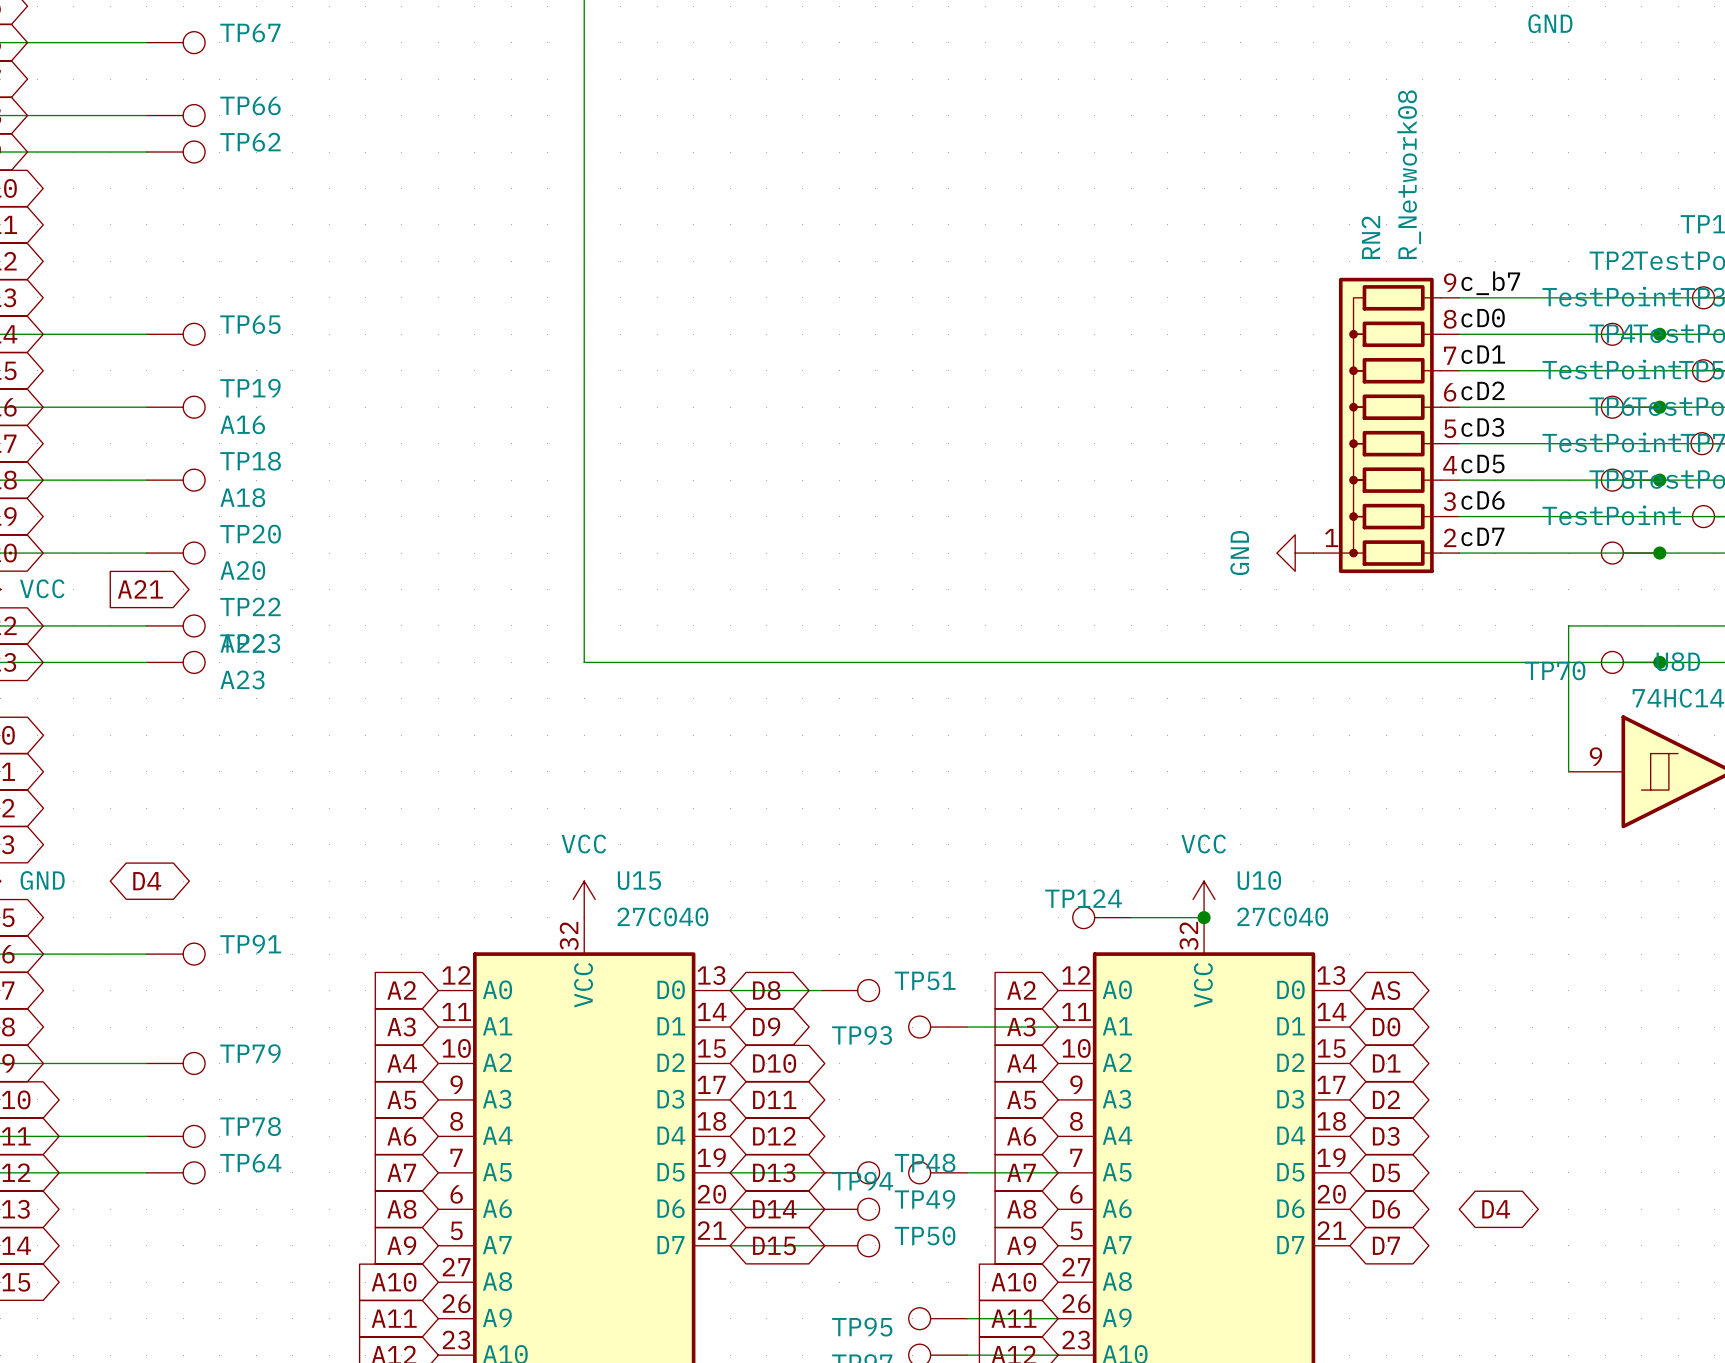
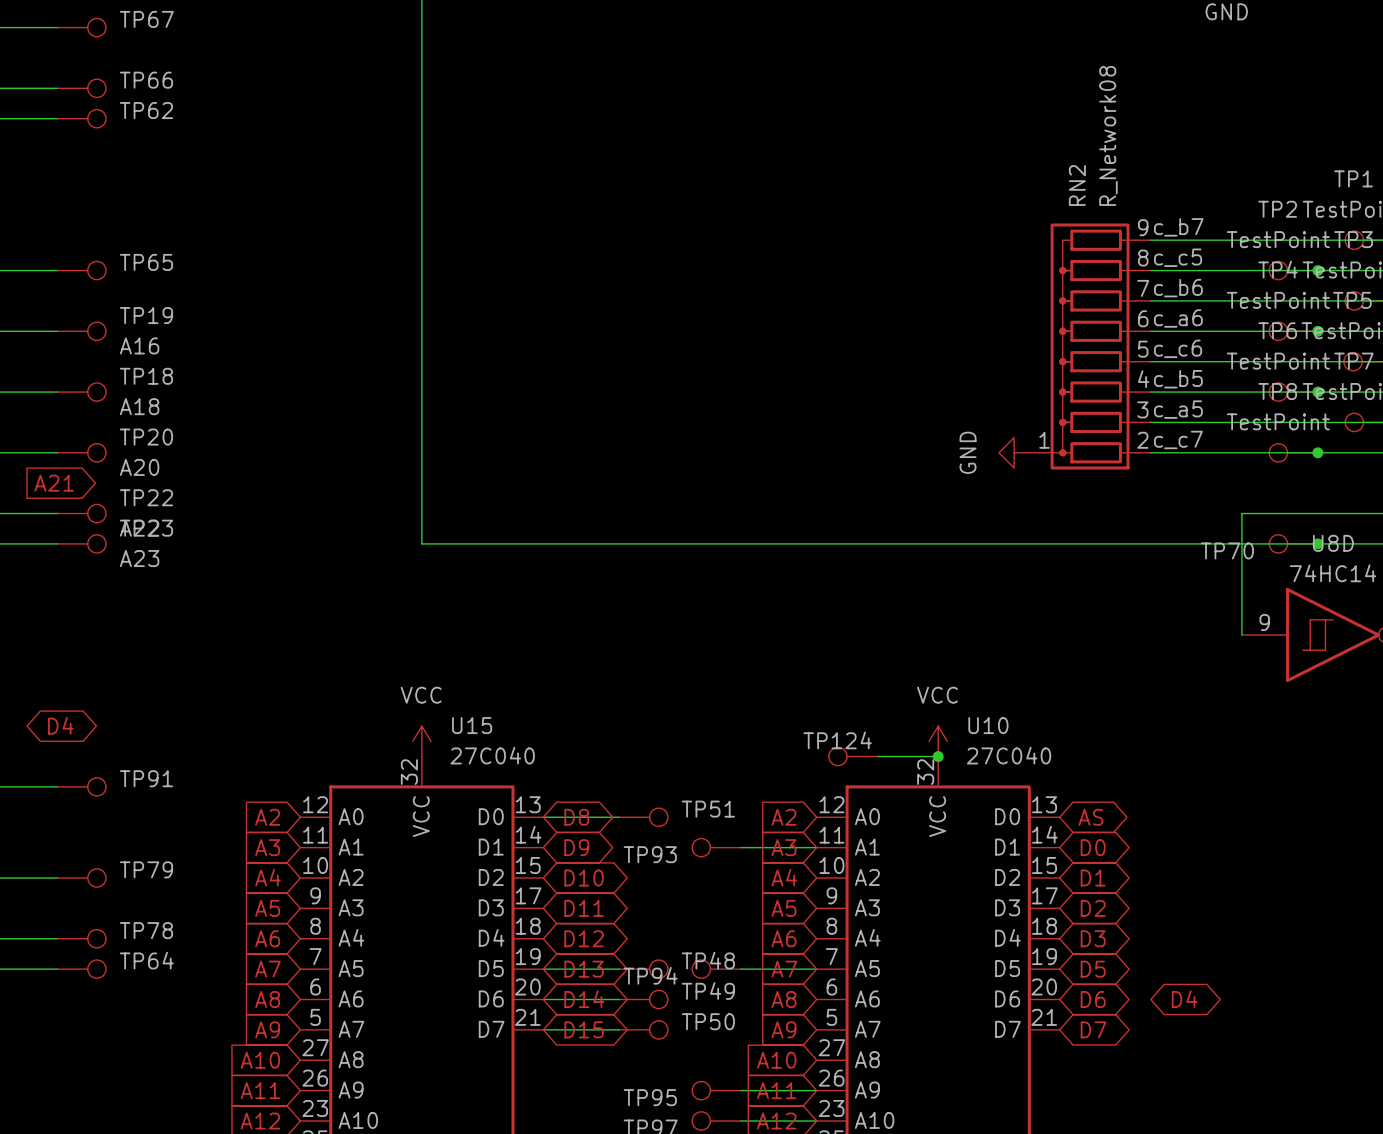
label: cD0 (1483, 318) -> c_c5 (1178, 257)
label: cD1 (1483, 354) -> c_b6 (1178, 288)
label: cD2 (1483, 390) -> c_a6 (1178, 318)
label: cD3 (1482, 427) -> c_c6 (1178, 348)
label: cD5 (1482, 464) -> c_b5 (1178, 379)
label: cD6 (1483, 500) -> c_a5 (1178, 409)
label: cD7 (1482, 536) -> c_c7 (1178, 439)

